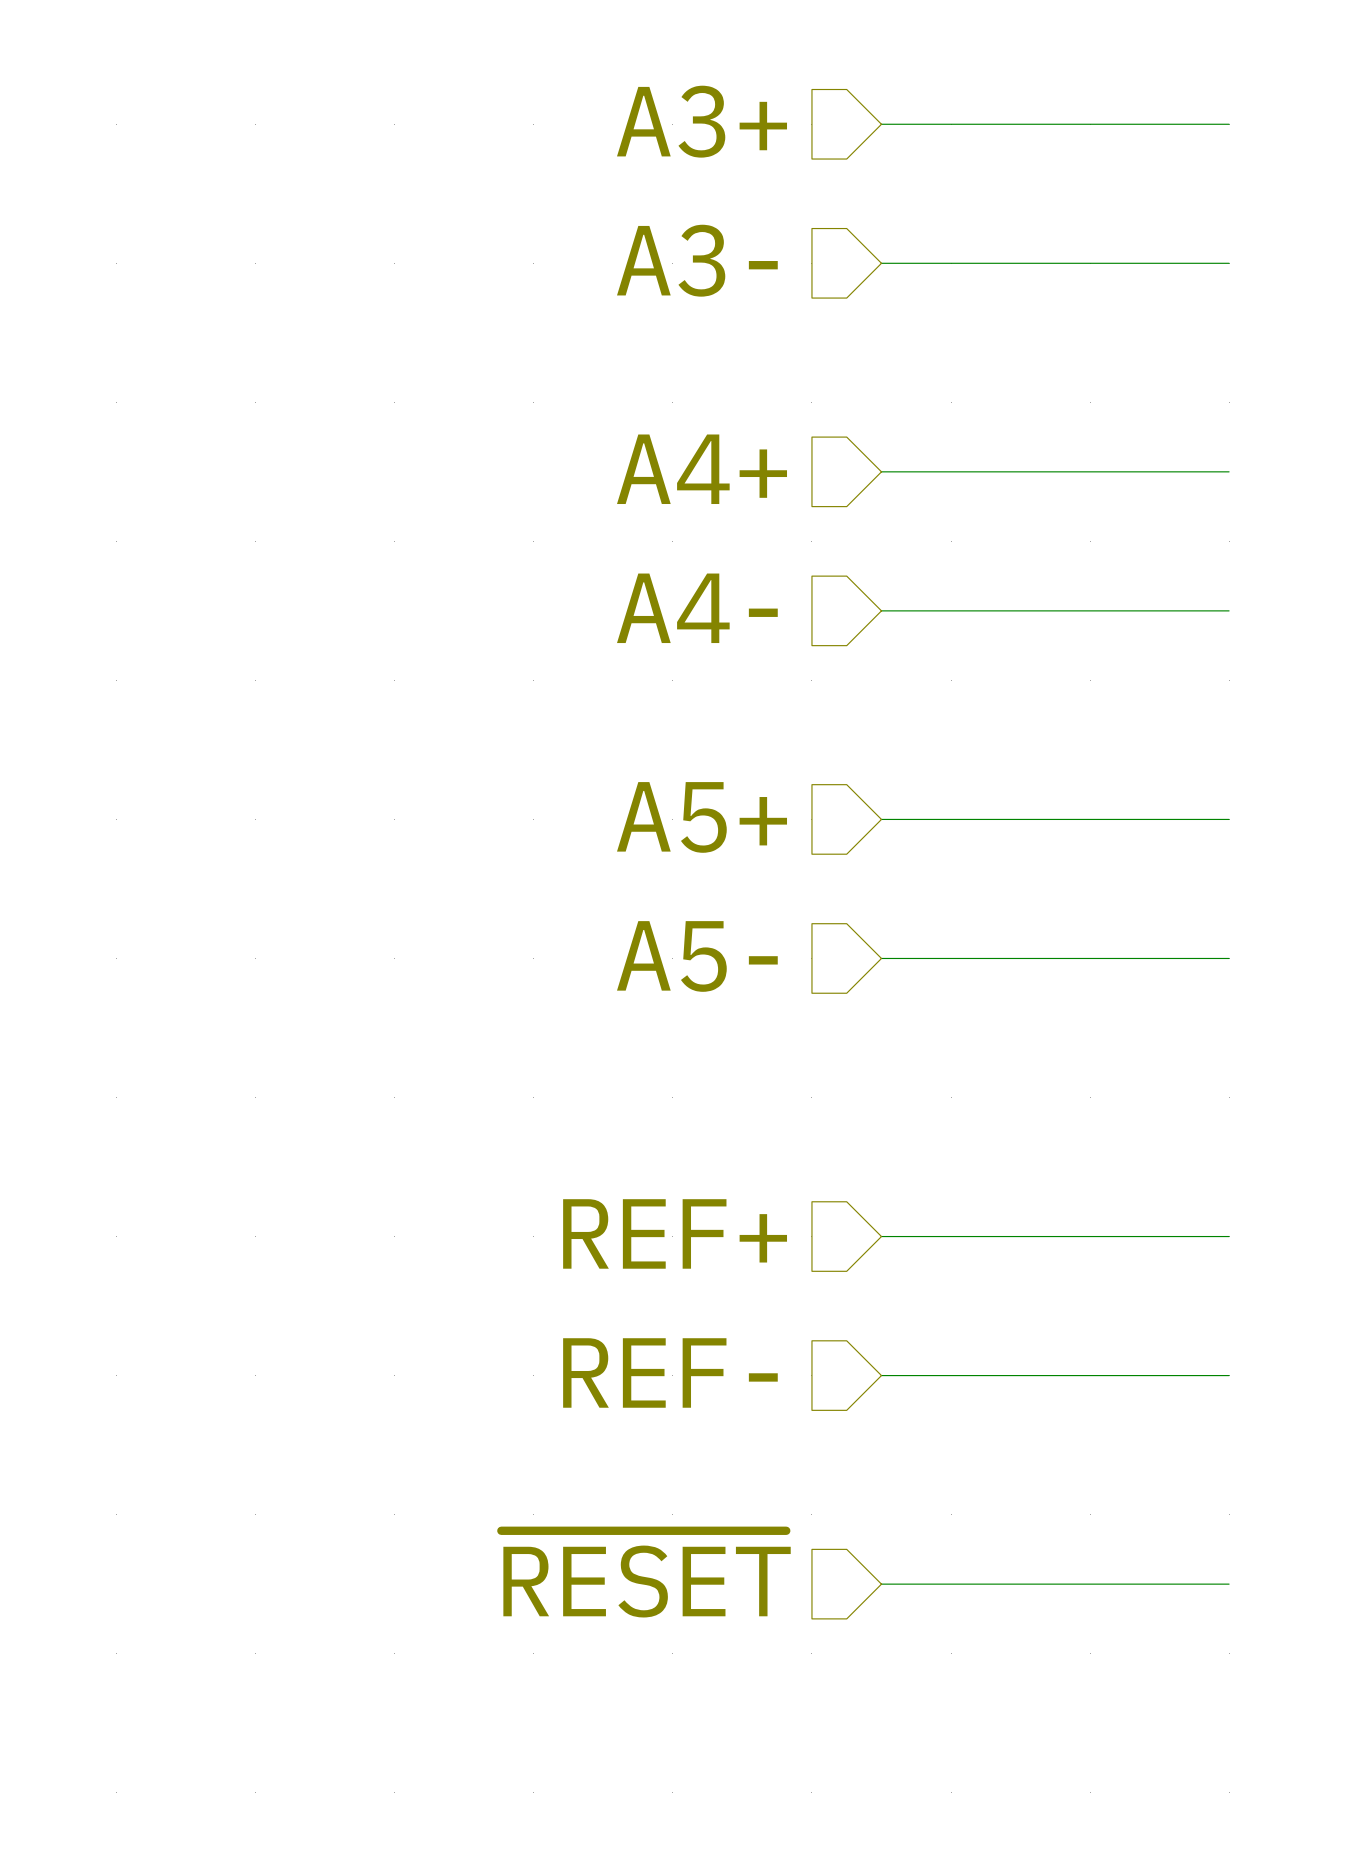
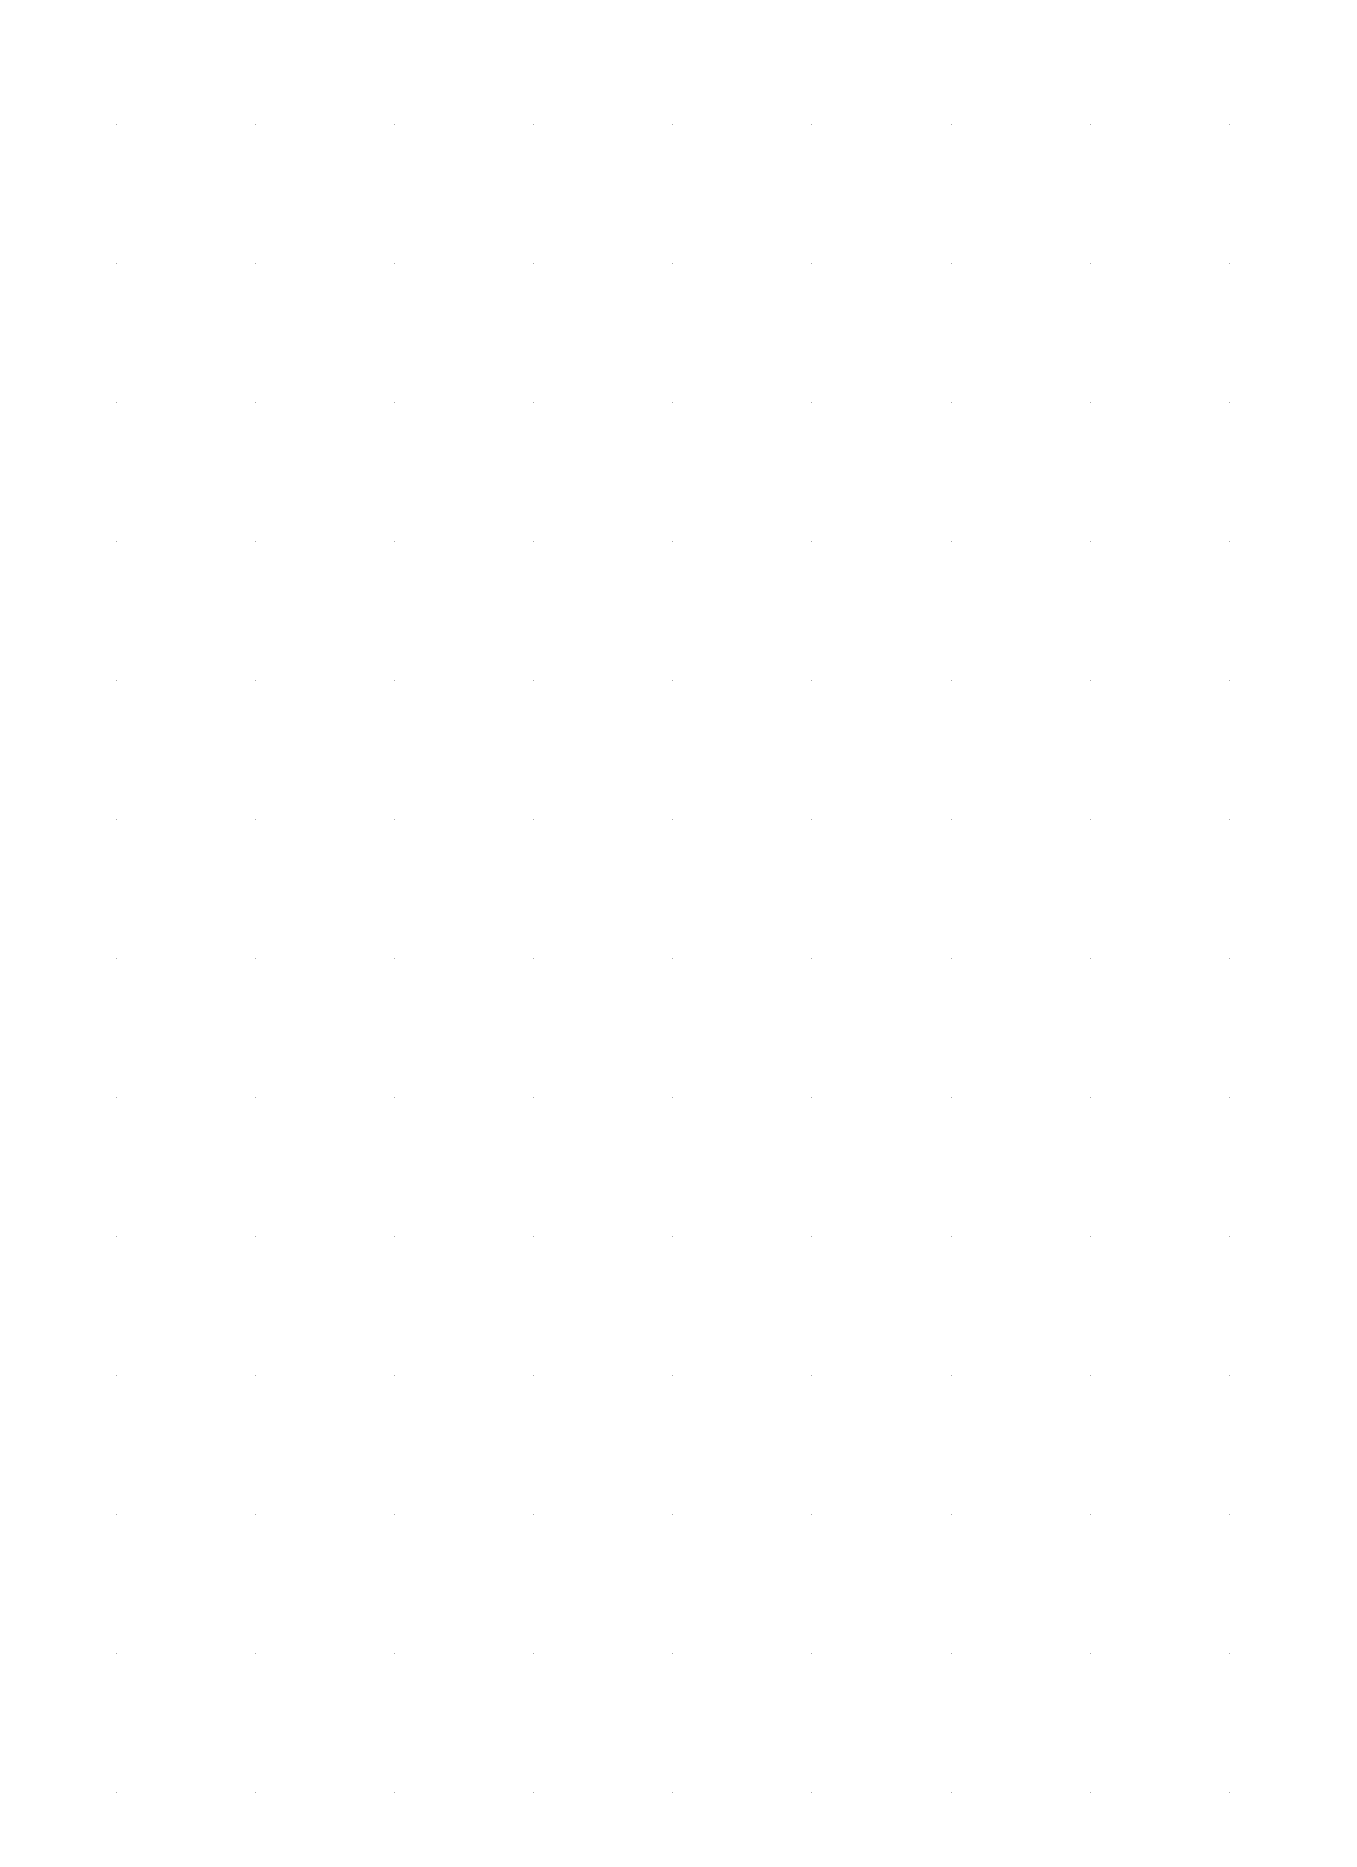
hierarchical label: A3+ (702, 121) -> none
wire: (881, 124) (1229, 124) -> none
hierarchical label: A3- (697, 260) -> none
wire: (881, 263) (1229, 263) -> none
hierarchical label: A4+ (702, 469) -> none
wire: (881, 471) (1229, 471) -> none
hierarchical label: A4- (697, 608) -> none
wire: (881, 610) (1229, 610) -> none
hierarchical label: A5+ (702, 817) -> none
wire: (881, 819) (1229, 819) -> none
hierarchical label: A5- (697, 956) -> none
wire: (881, 958) (1229, 958) -> none
hierarchical label: REF+ (675, 1233) -> none
wire: (881, 1236) (1229, 1236) -> none
hierarchical label: REF- (670, 1372) -> none
wire: (881, 1375) (1229, 1375) -> none
hierarchical label: ~{RESET} (646, 1574) -> none
wire: (881, 1584) (1229, 1584) -> none

